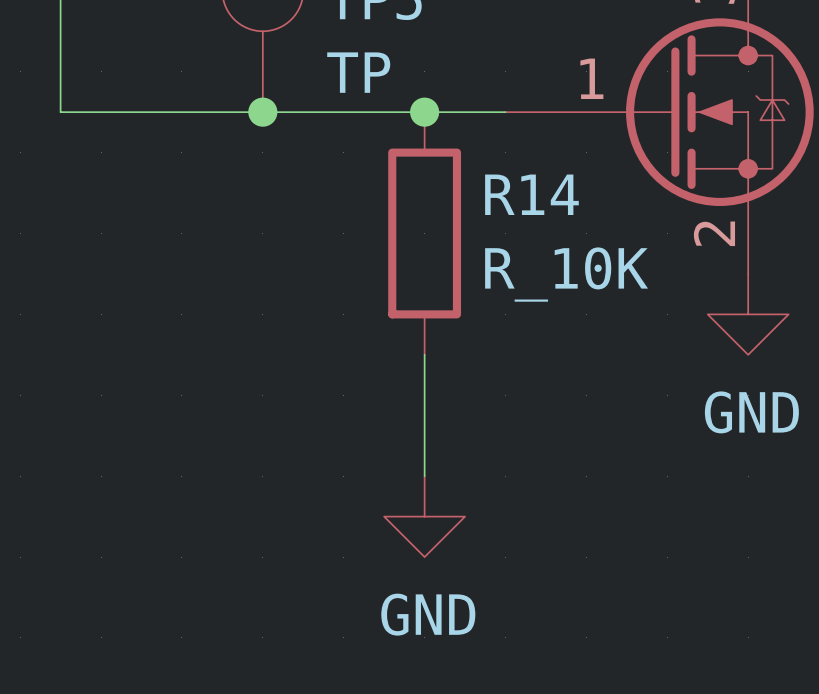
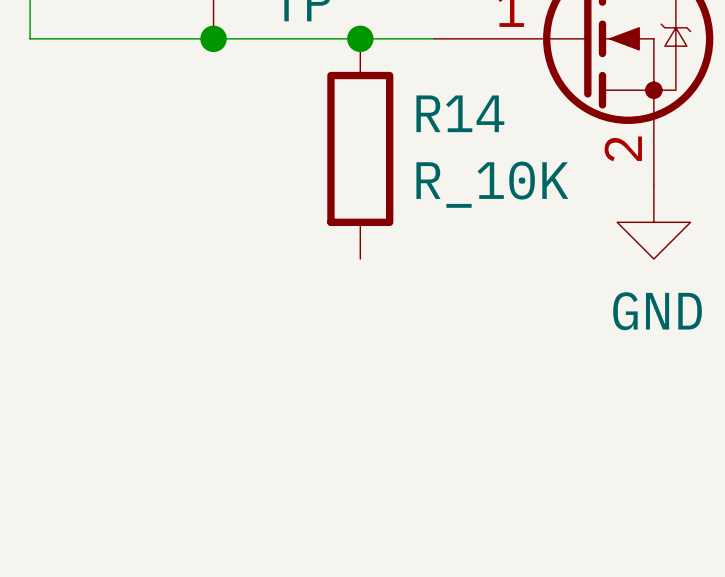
wire: (424, 354) (424, 476) -> none
power symbol: GND (424, 516) -> none

